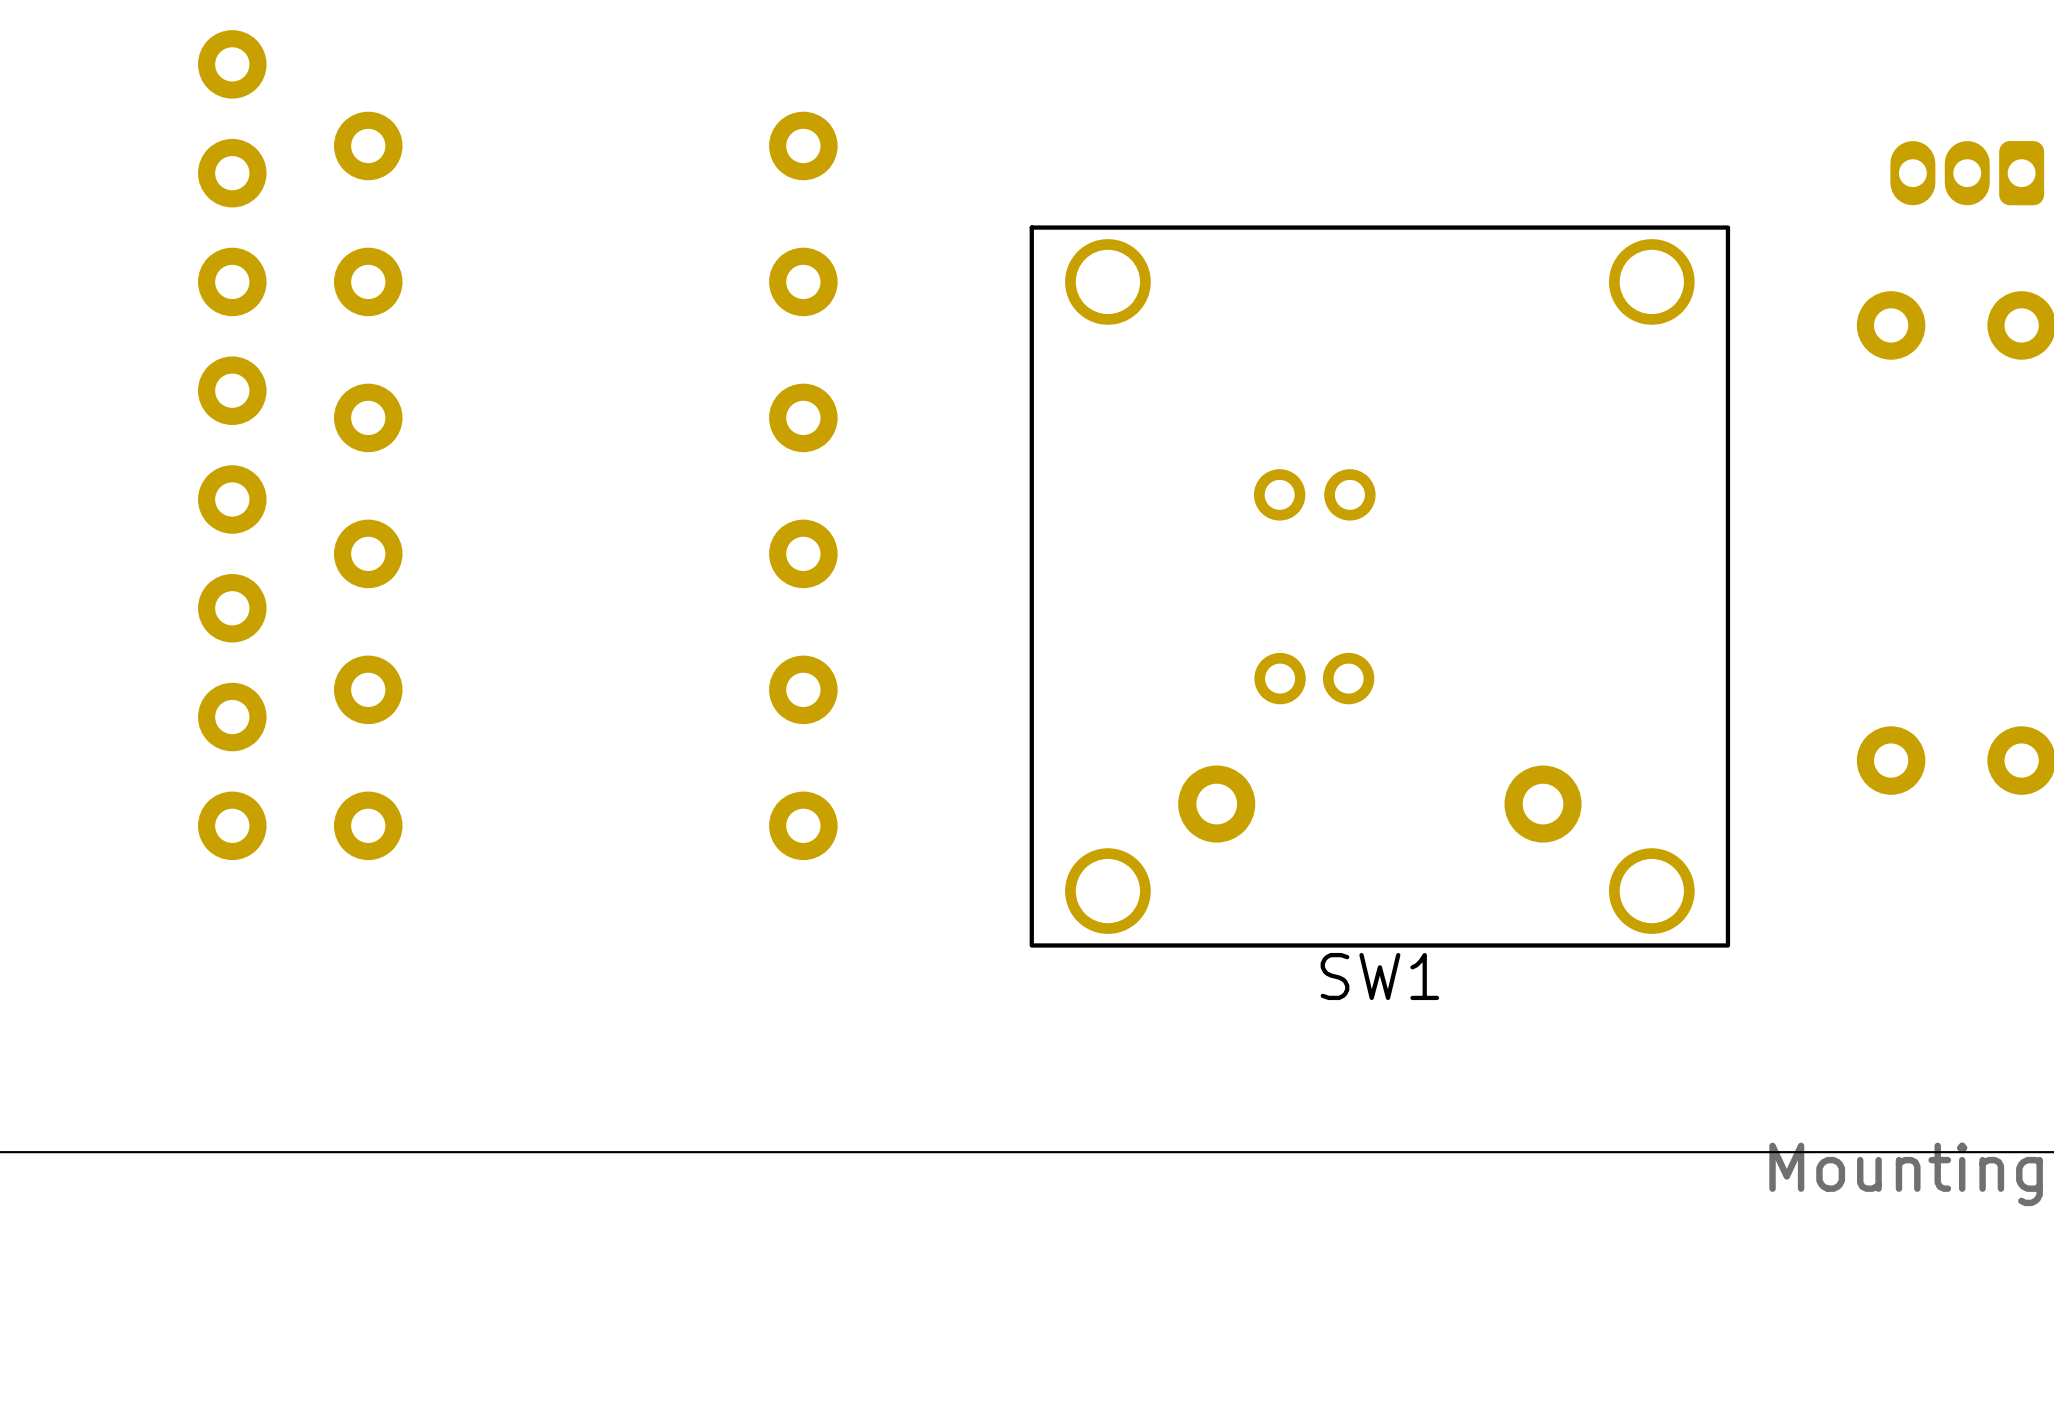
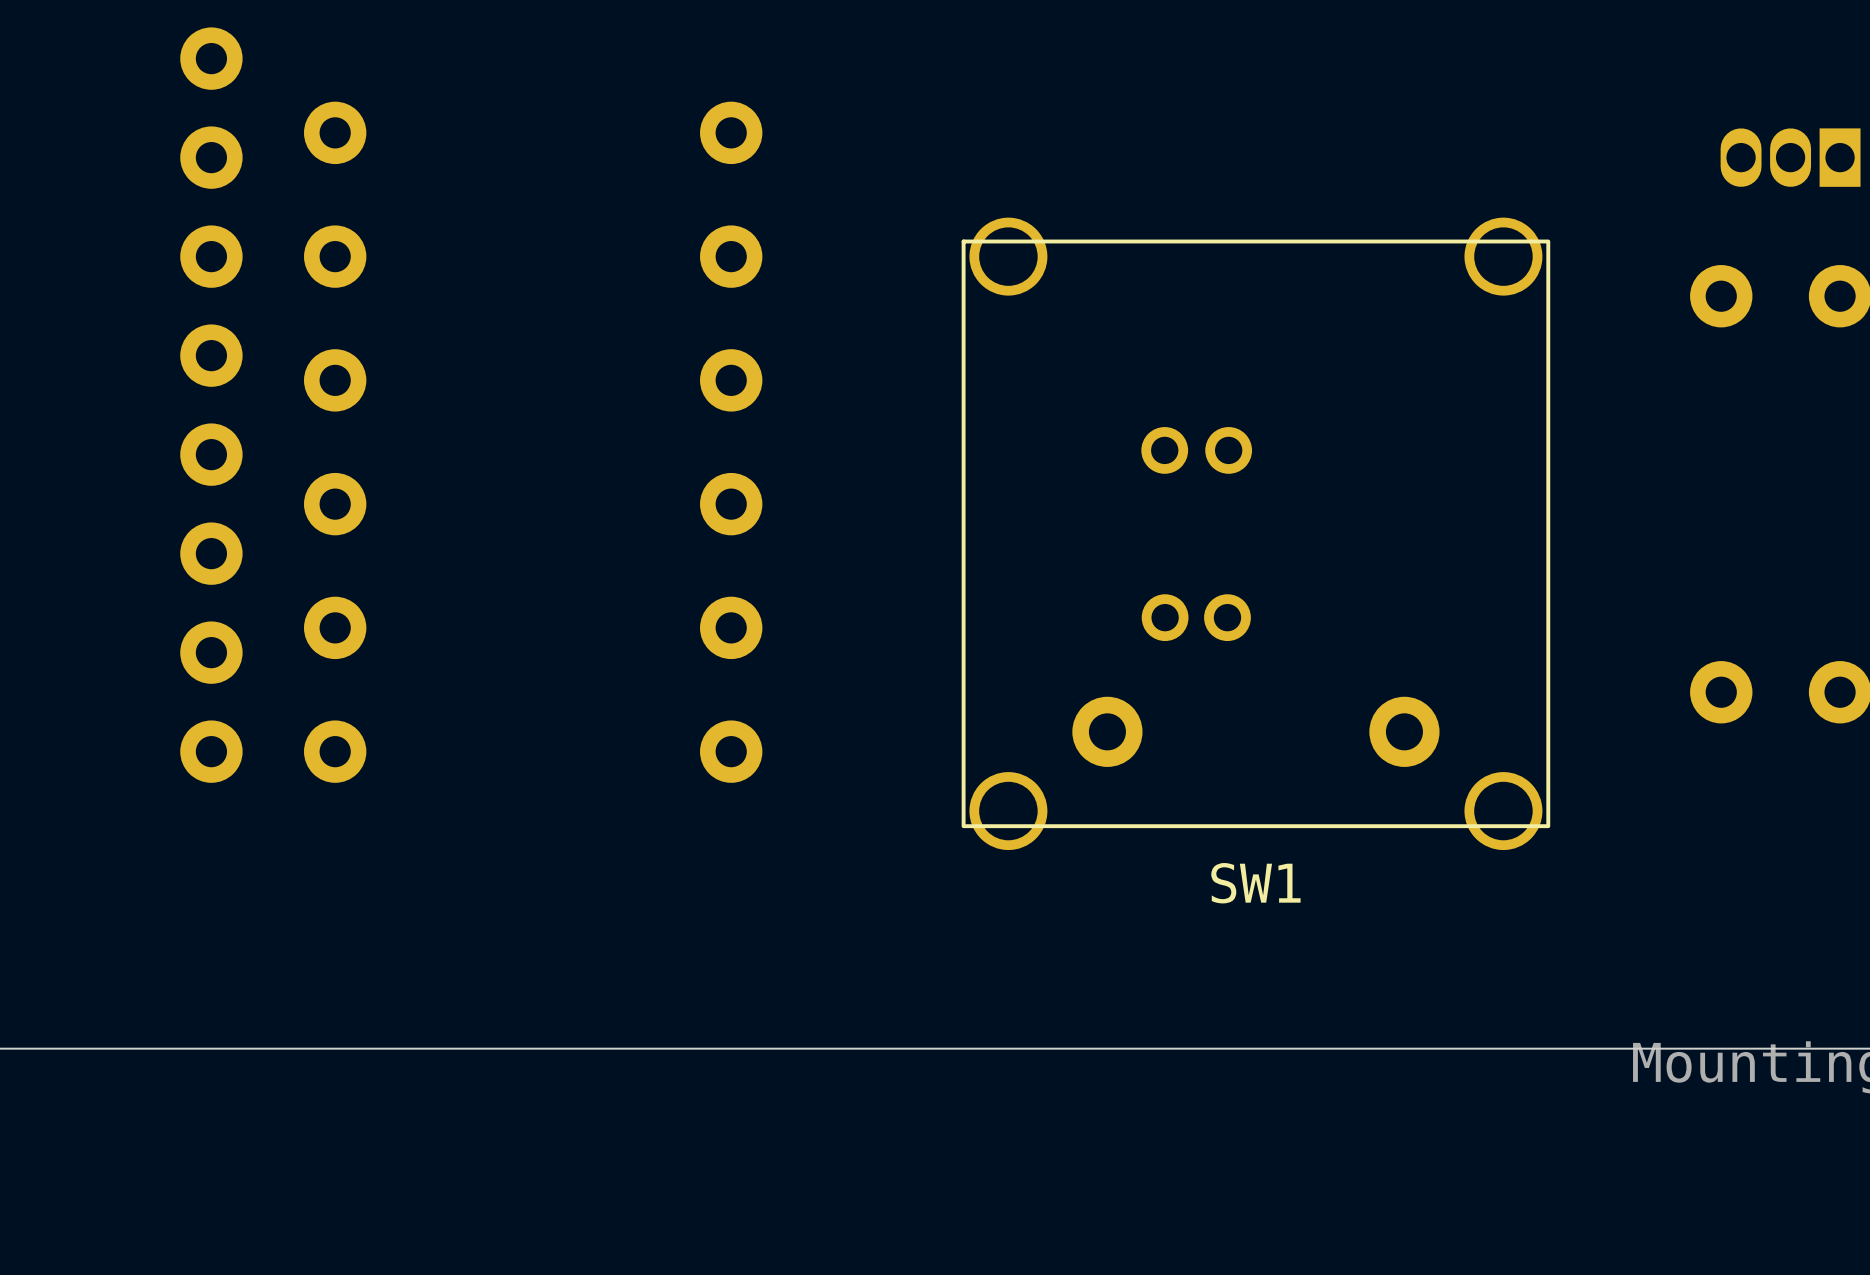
part footprint: [1890, 141, 2045, 206] -> [1720, 128, 1861, 187]
SW1 footprint: [1029, 225, 1731, 948] -> [961, 217, 1551, 851]

